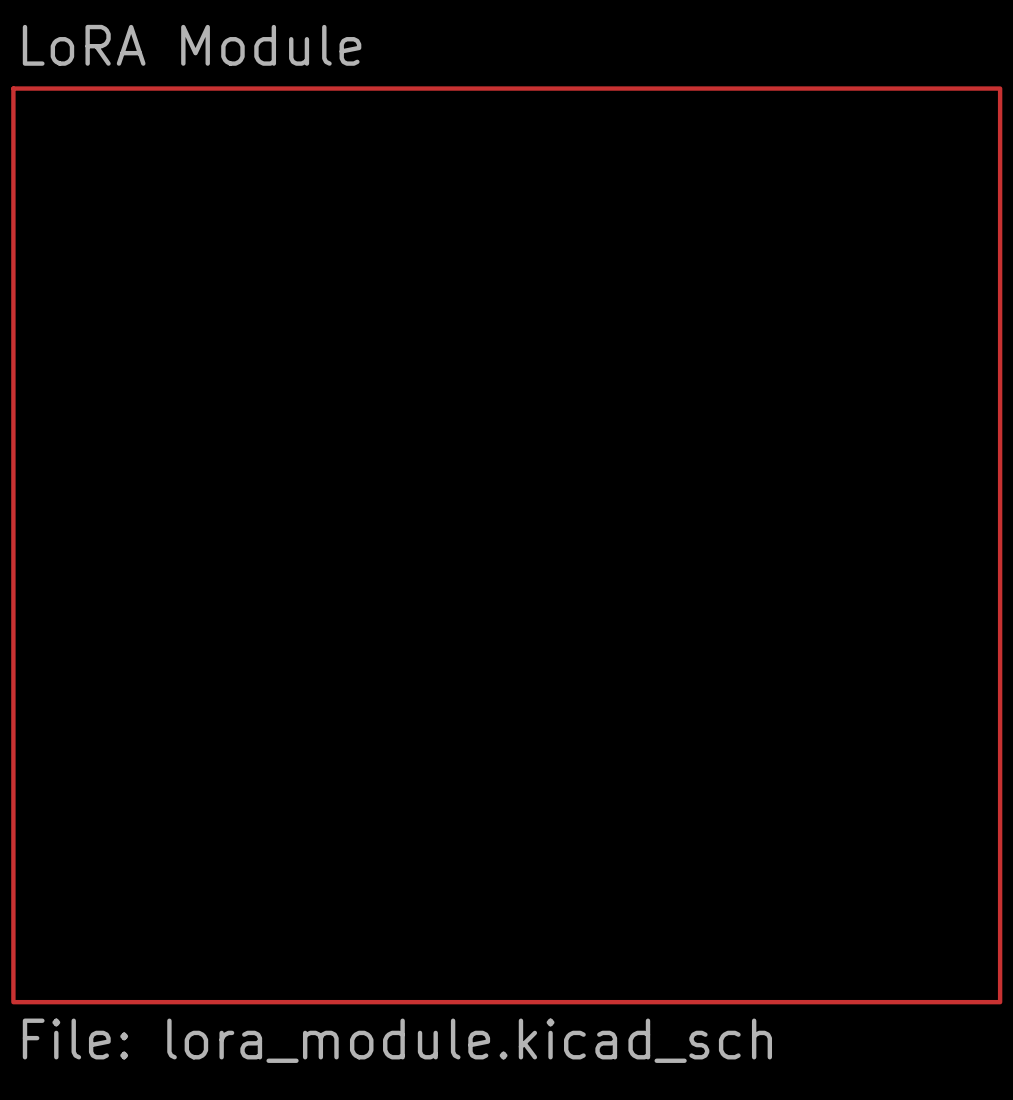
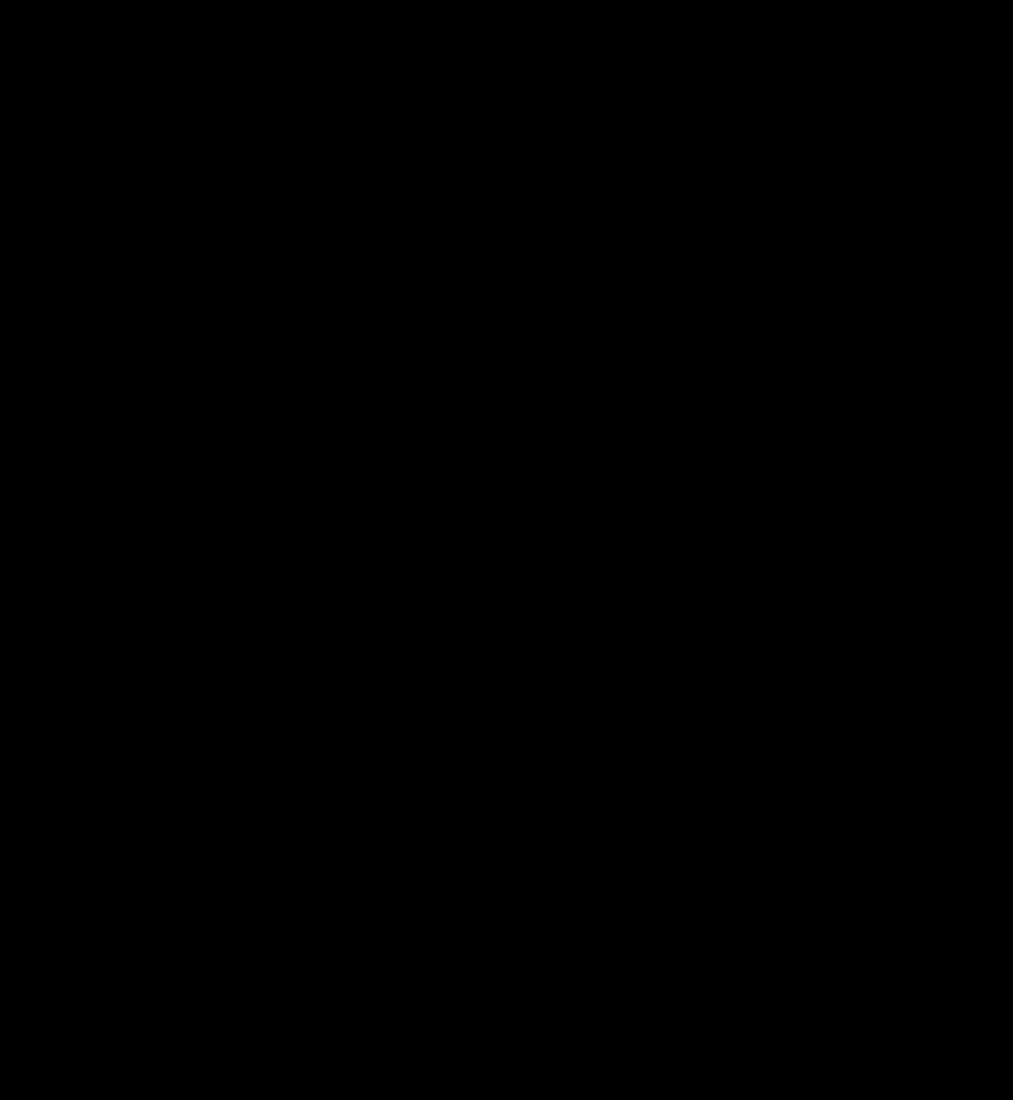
sheet LoRA Module: File: lora_module.kicad_sch (506, 545) -> none

